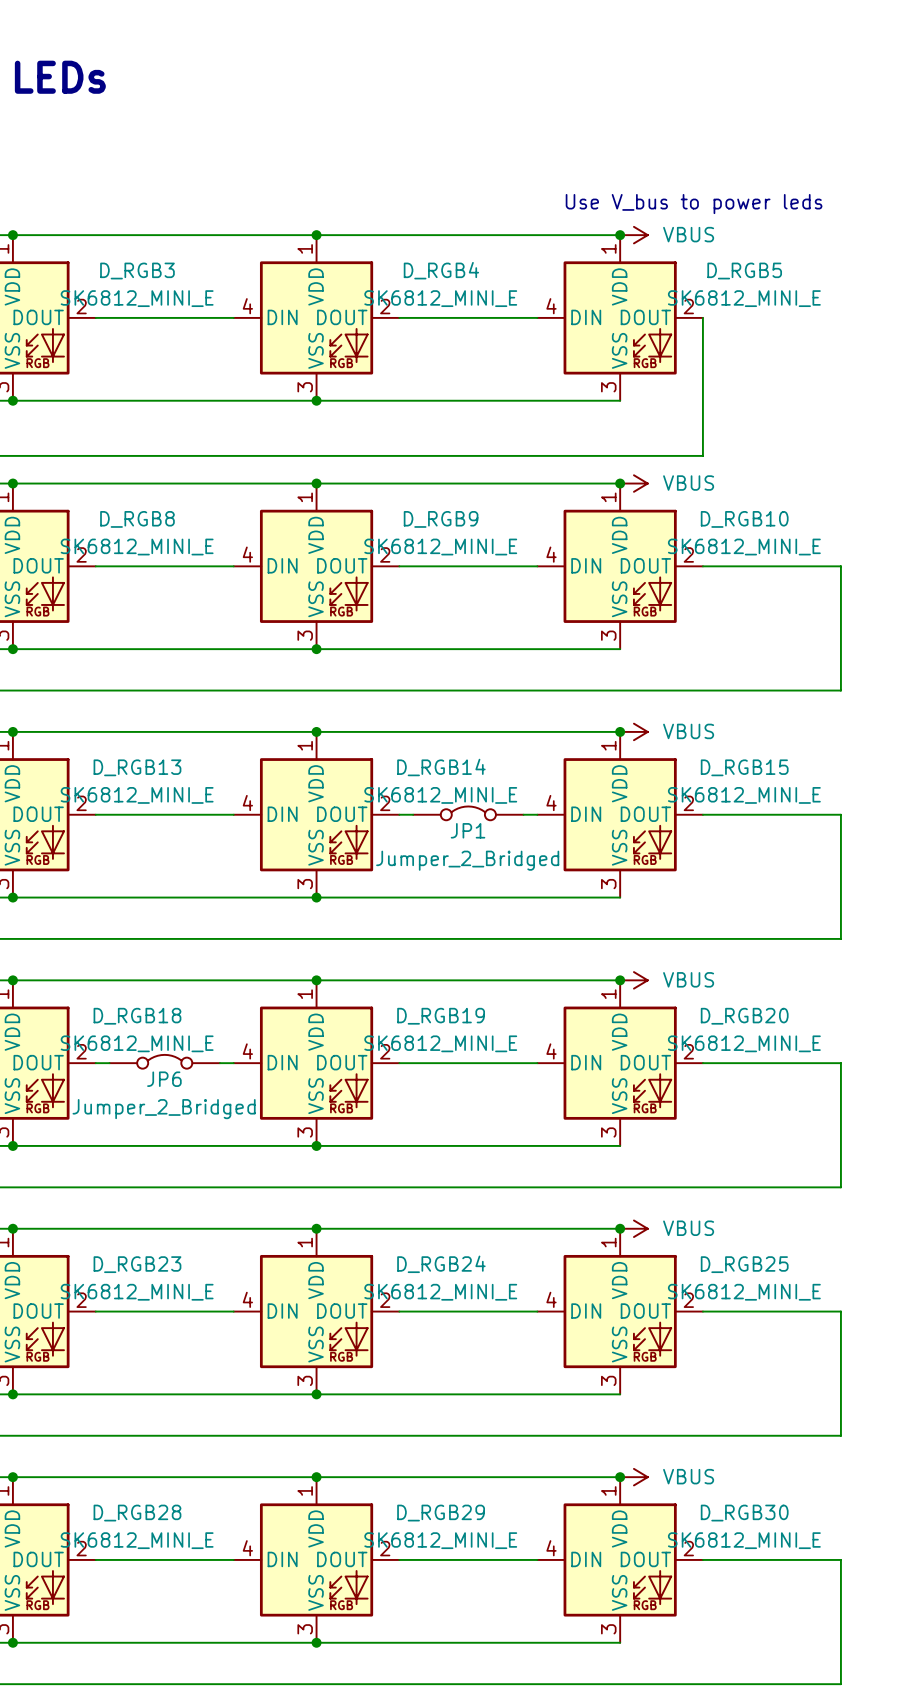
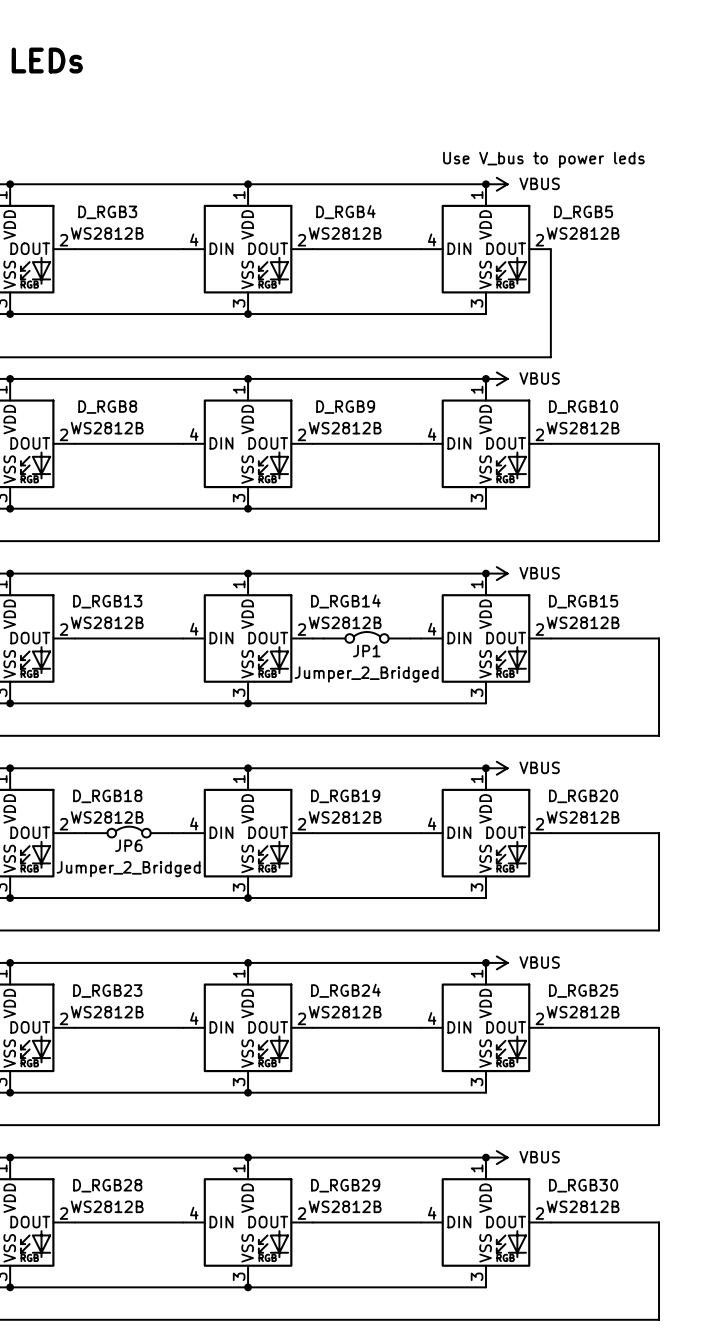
D_RGB3 value: SK6812_MINI_E (137, 298) -> WS2812B (107, 233)
D_RGB4 value: SK6812_MINI_E (440, 298) -> WS2812B (345, 233)
D_RGB5 value: SK6812_MINI_E (744, 298) -> WS2812B (583, 233)
D_RGB8 value: SK6812_MINI_E (137, 547) -> WS2812B (107, 428)
D_RGB9 value: SK6812_MINI_E (440, 547) -> WS2812B (345, 428)
D_RGB10 value: SK6812_MINI_E (744, 547) -> WS2812B (583, 428)
D_RGB13 value: SK6812_MINI_E (137, 795) -> WS2812B (107, 622)
D_RGB14 value: SK6812_MINI_E (440, 795) -> WS2812B (345, 622)
D_RGB15 value: SK6812_MINI_E (744, 795) -> WS2812B (583, 622)
D_RGB18 value: SK6812_MINI_E (137, 1043) -> WS2812B (107, 817)
D_RGB19 value: SK6812_MINI_E (440, 1043) -> WS2812B (345, 817)
D_RGB20 value: SK6812_MINI_E (744, 1043) -> WS2812B (583, 817)
D_RGB23 value: SK6812_MINI_E (137, 1292) -> WS2812B (107, 1012)
D_RGB24 value: SK6812_MINI_E (440, 1292) -> WS2812B (345, 1012)
D_RGB25 value: SK6812_MINI_E (744, 1292) -> WS2812B (583, 1012)
D_RGB28 value: SK6812_MINI_E (137, 1540) -> WS2812B (107, 1206)
D_RGB29 value: SK6812_MINI_E (440, 1540) -> WS2812B (345, 1206)
D_RGB30 value: SK6812_MINI_E (744, 1540) -> WS2812B (583, 1206)

